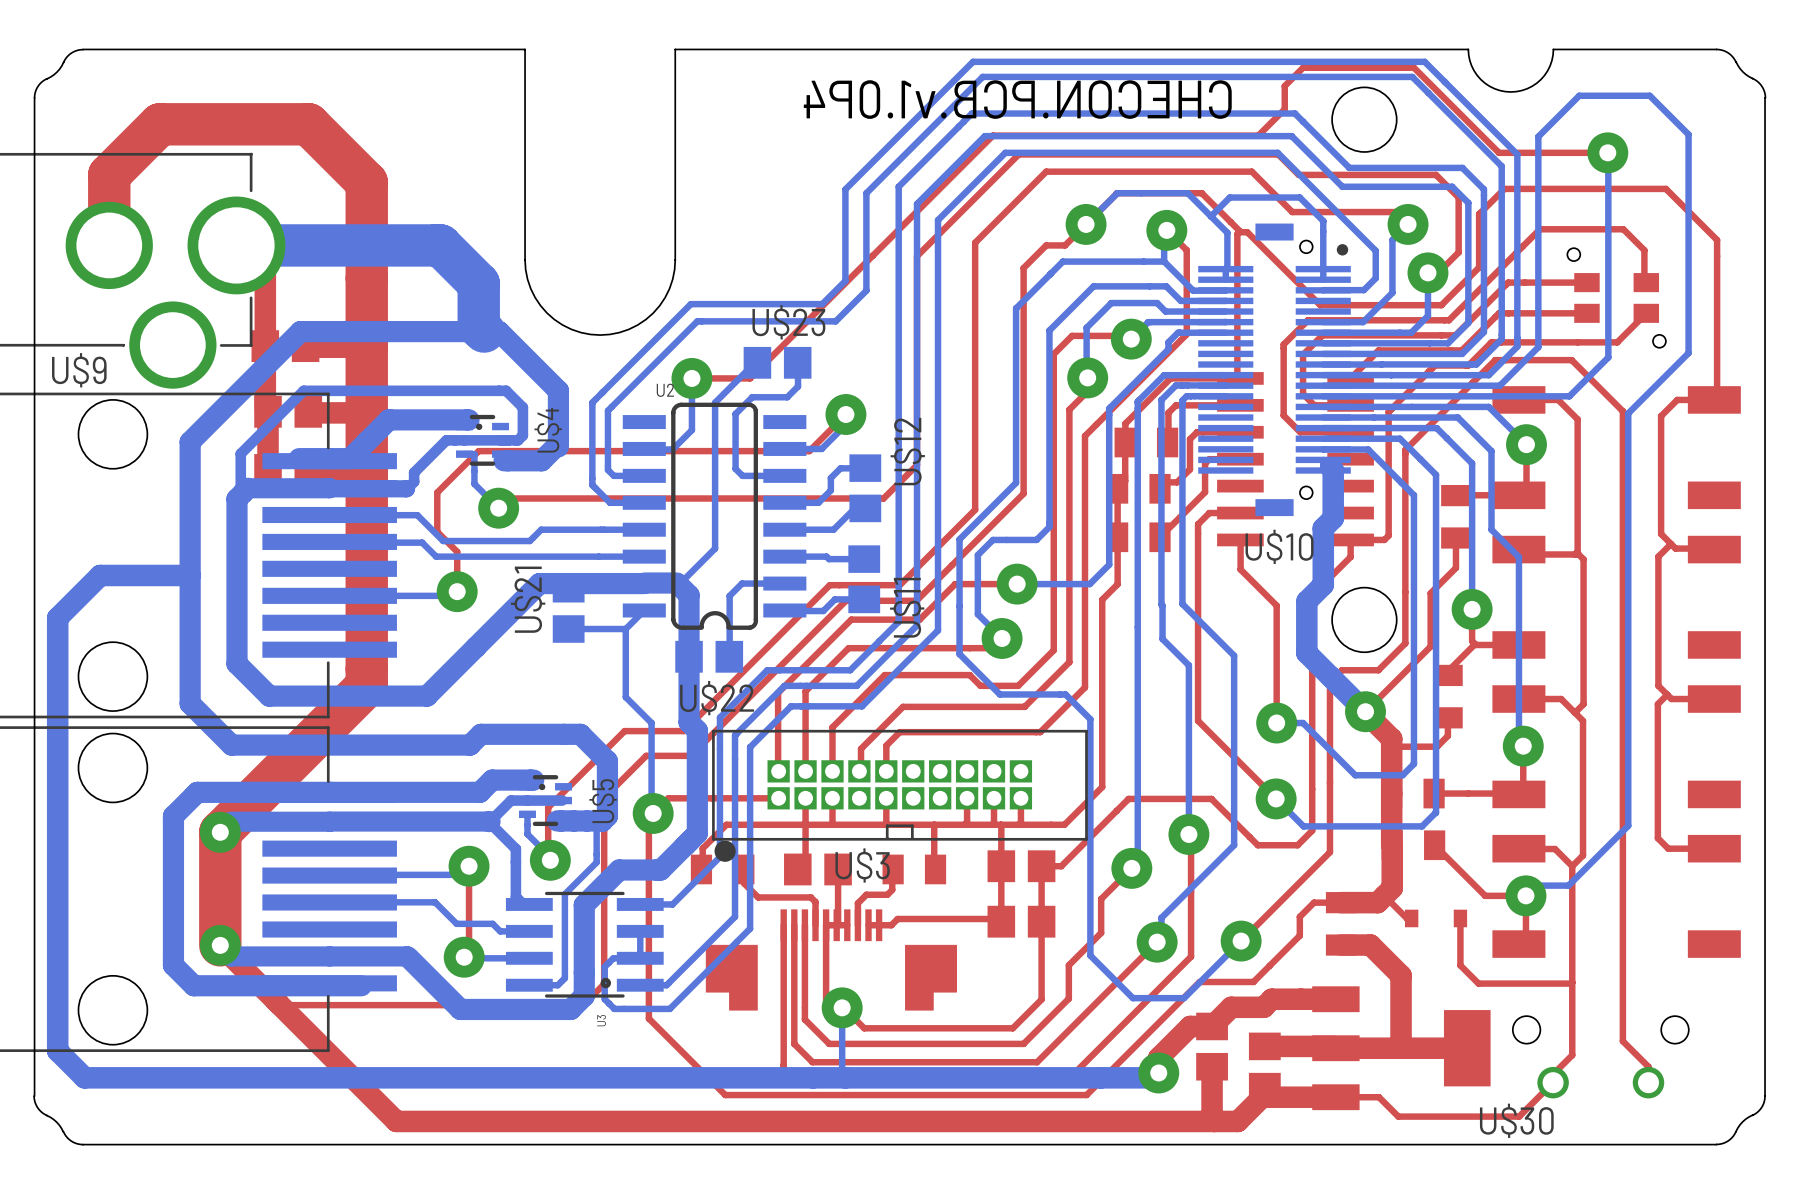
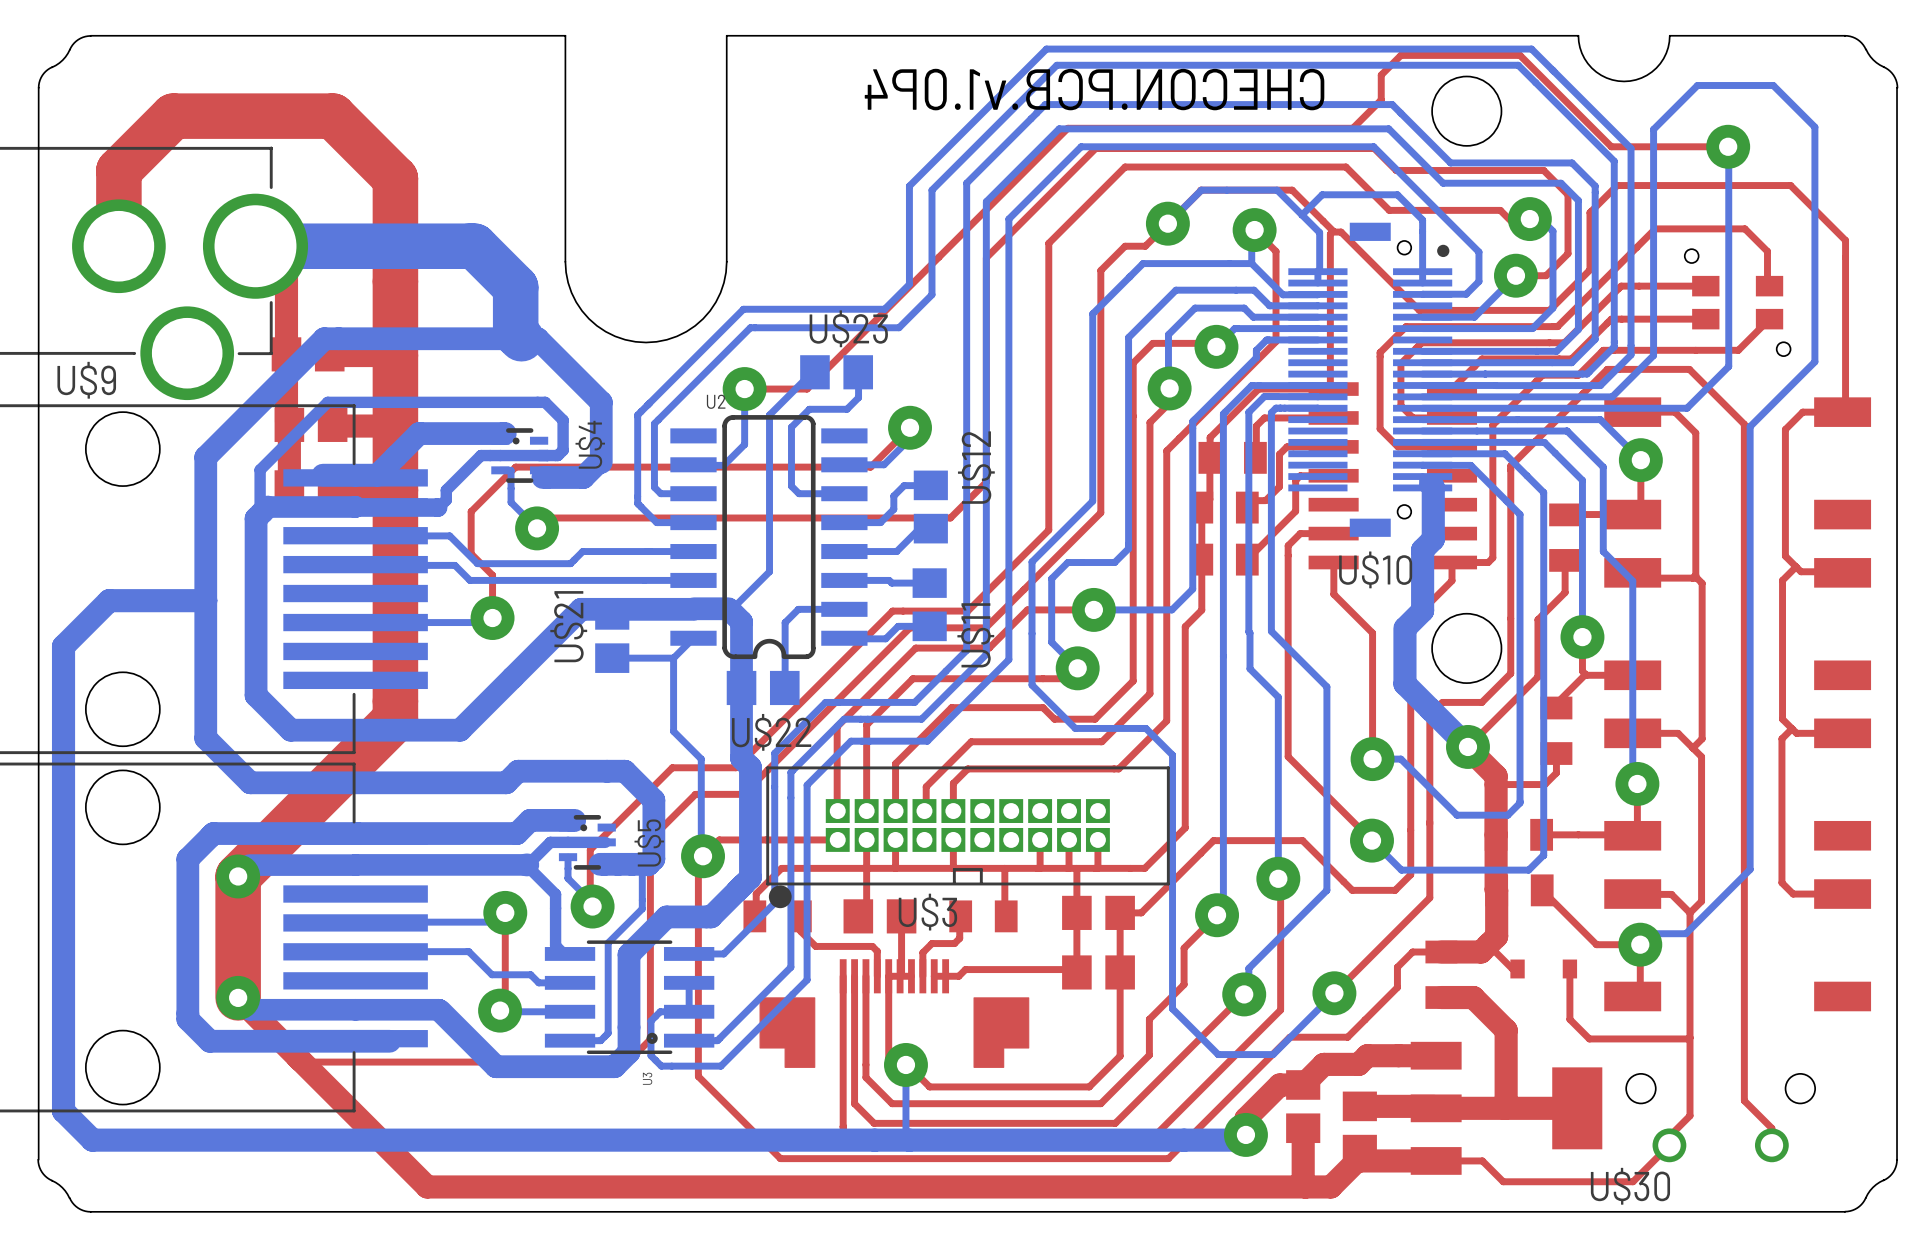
bottom track: (1408, 224) (1392, 240) (1392, 292) (1363, 322) -> (1529, 219) (1540, 219) (1552, 231) (1552, 308) (1532, 328) (1465, 328)
via position: (1408, 224) -> (1529, 219)
bottom track: none -> (1515, 275) (1474, 317) (1422, 317)
bottom track: (1427, 272) (1427, 315) (1411, 332) (1323, 332) -> none
via position: (1427, 272) -> (1515, 275)

